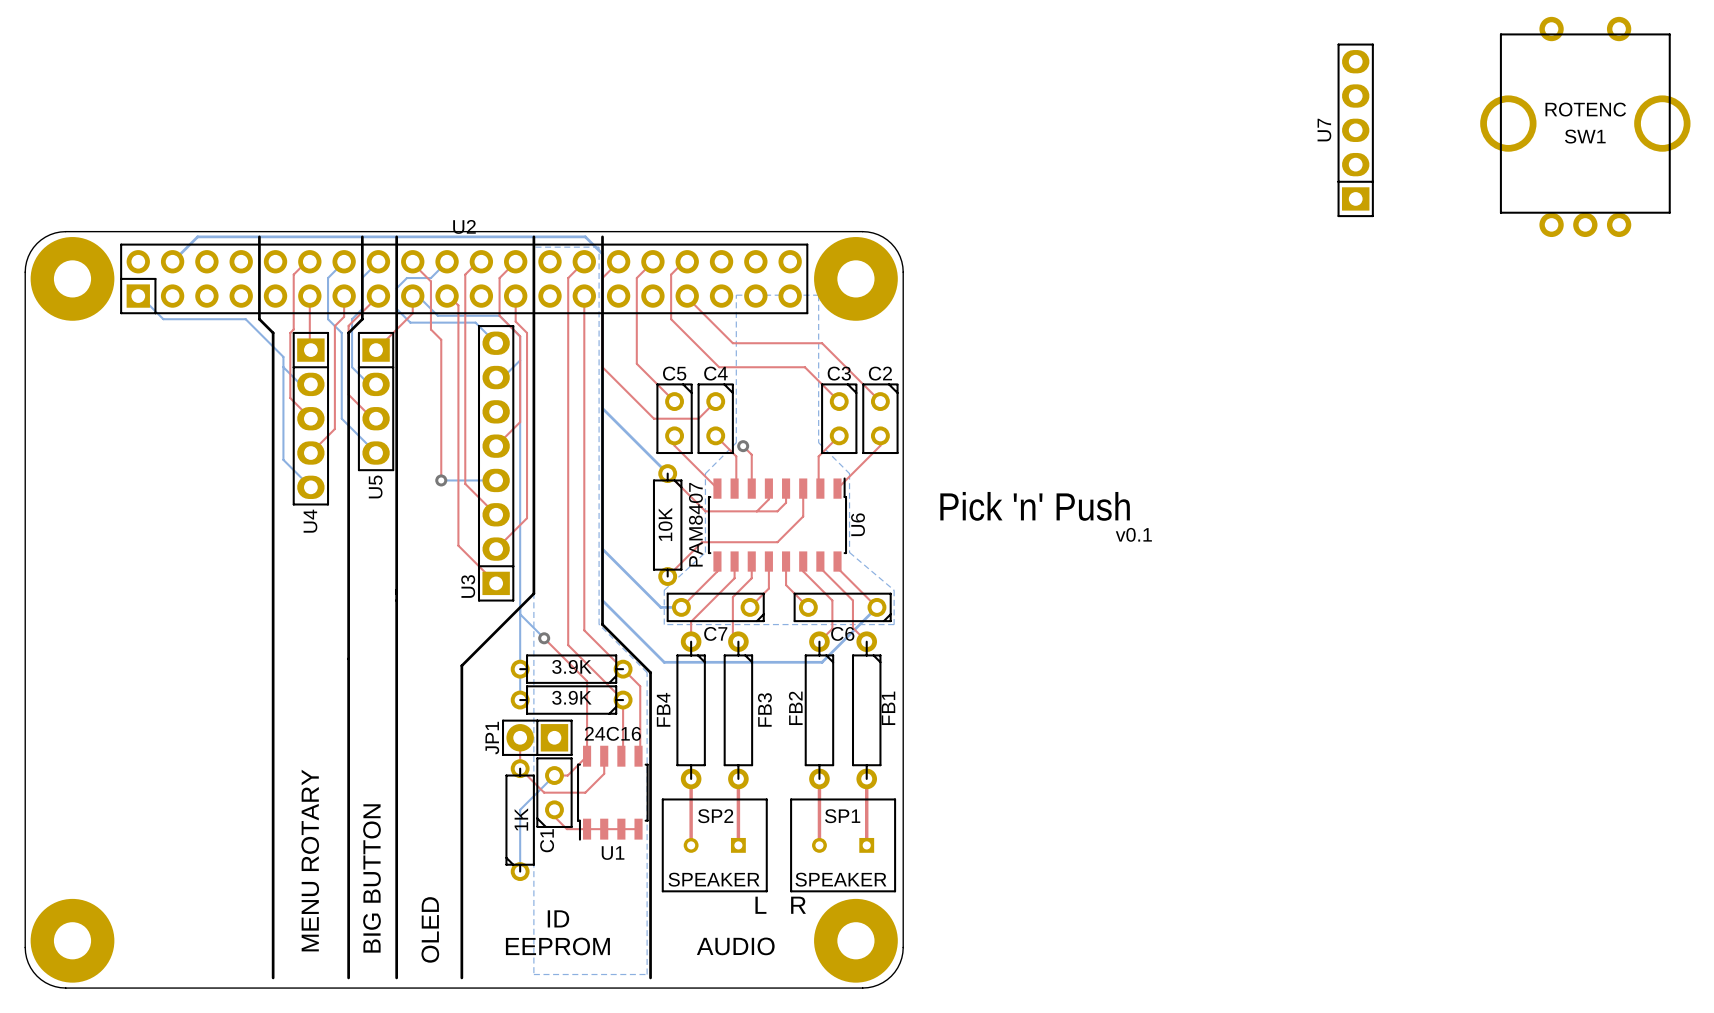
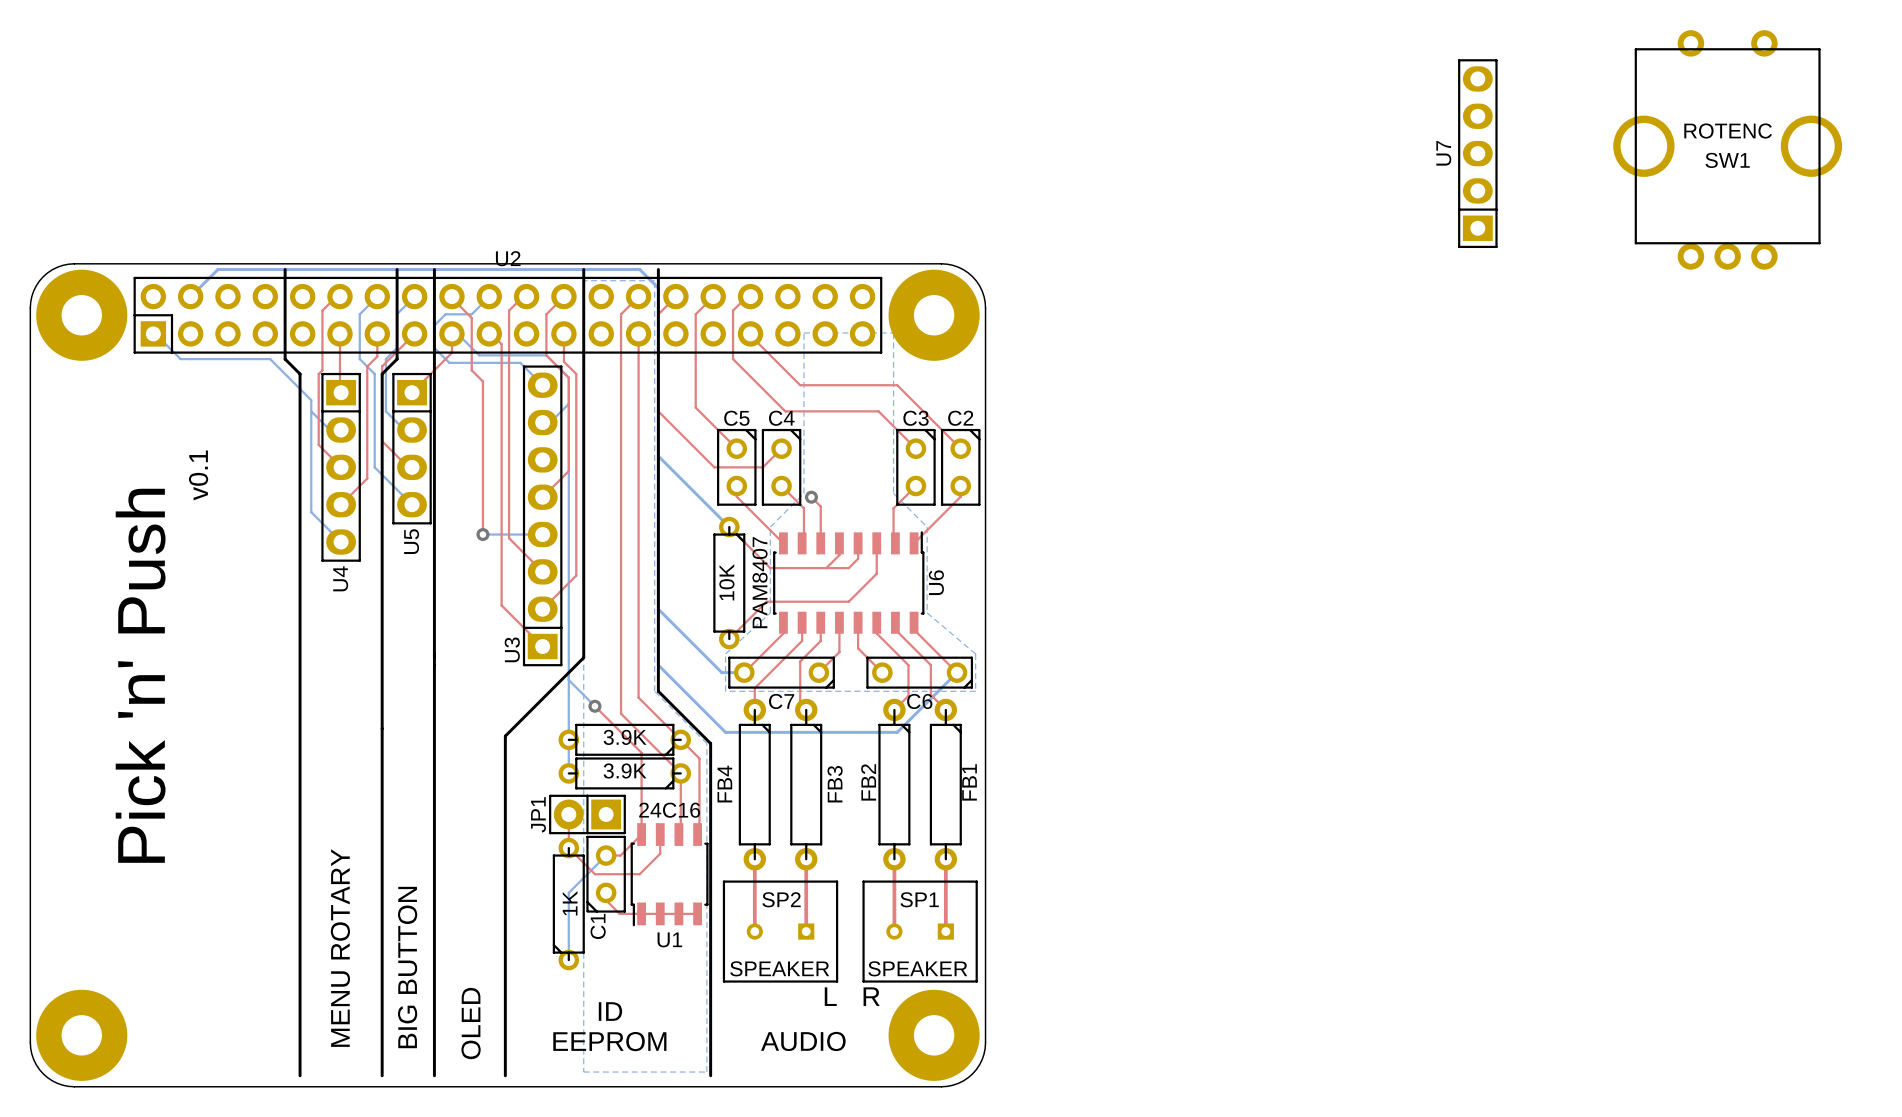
text: none -> v0.1 (198, 475)
text: Pick 'n' Push (1035, 506) -> none
text: v0.1 (1133, 534) -> none
text: none -> Pick 'n' Push (140, 675)

